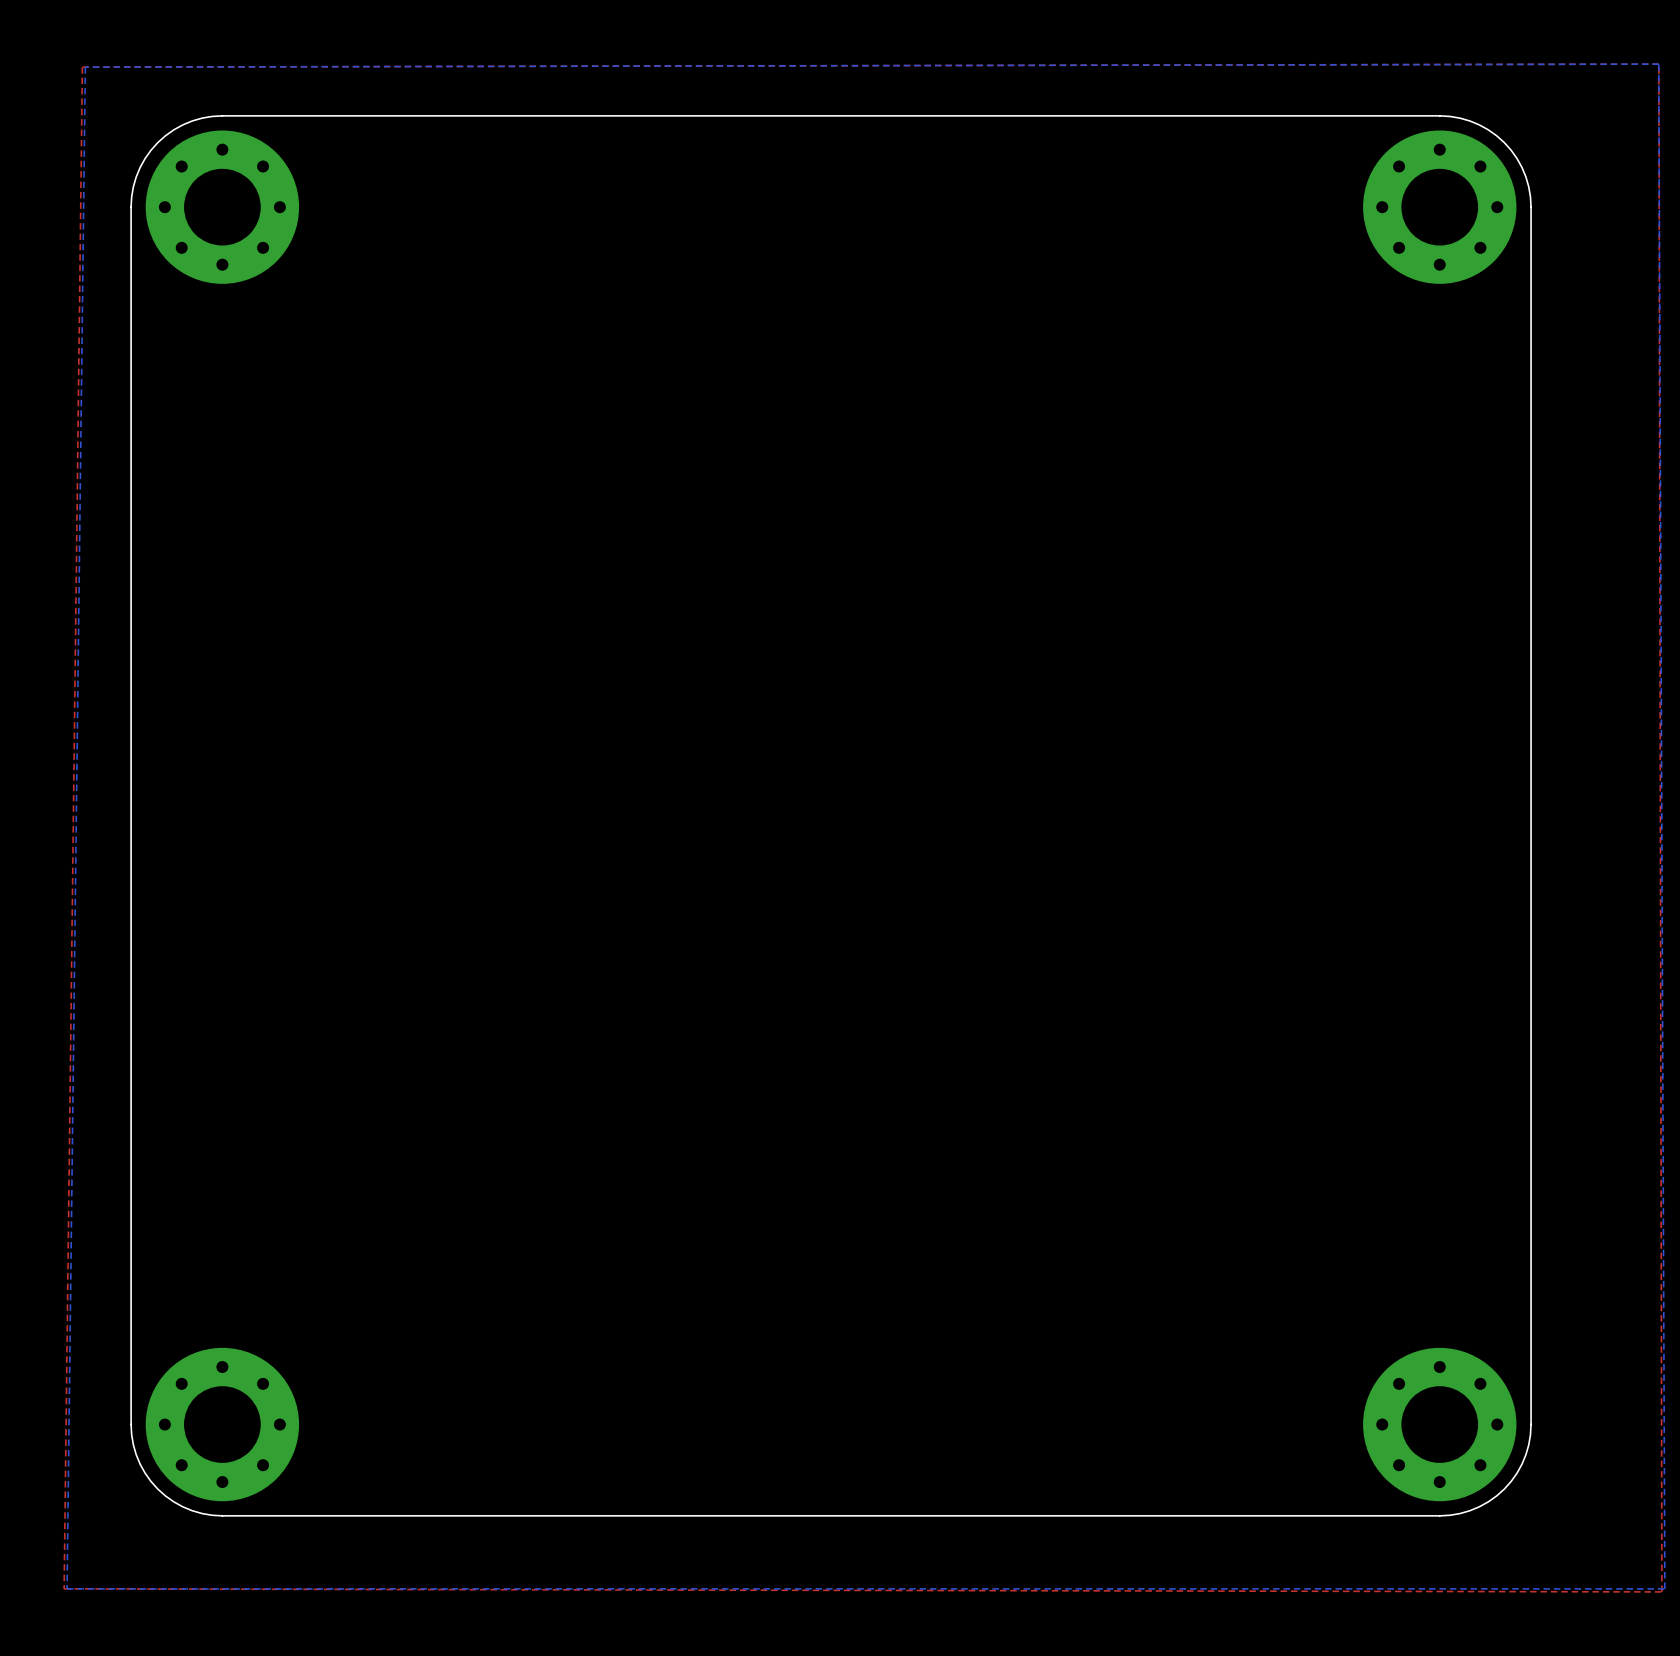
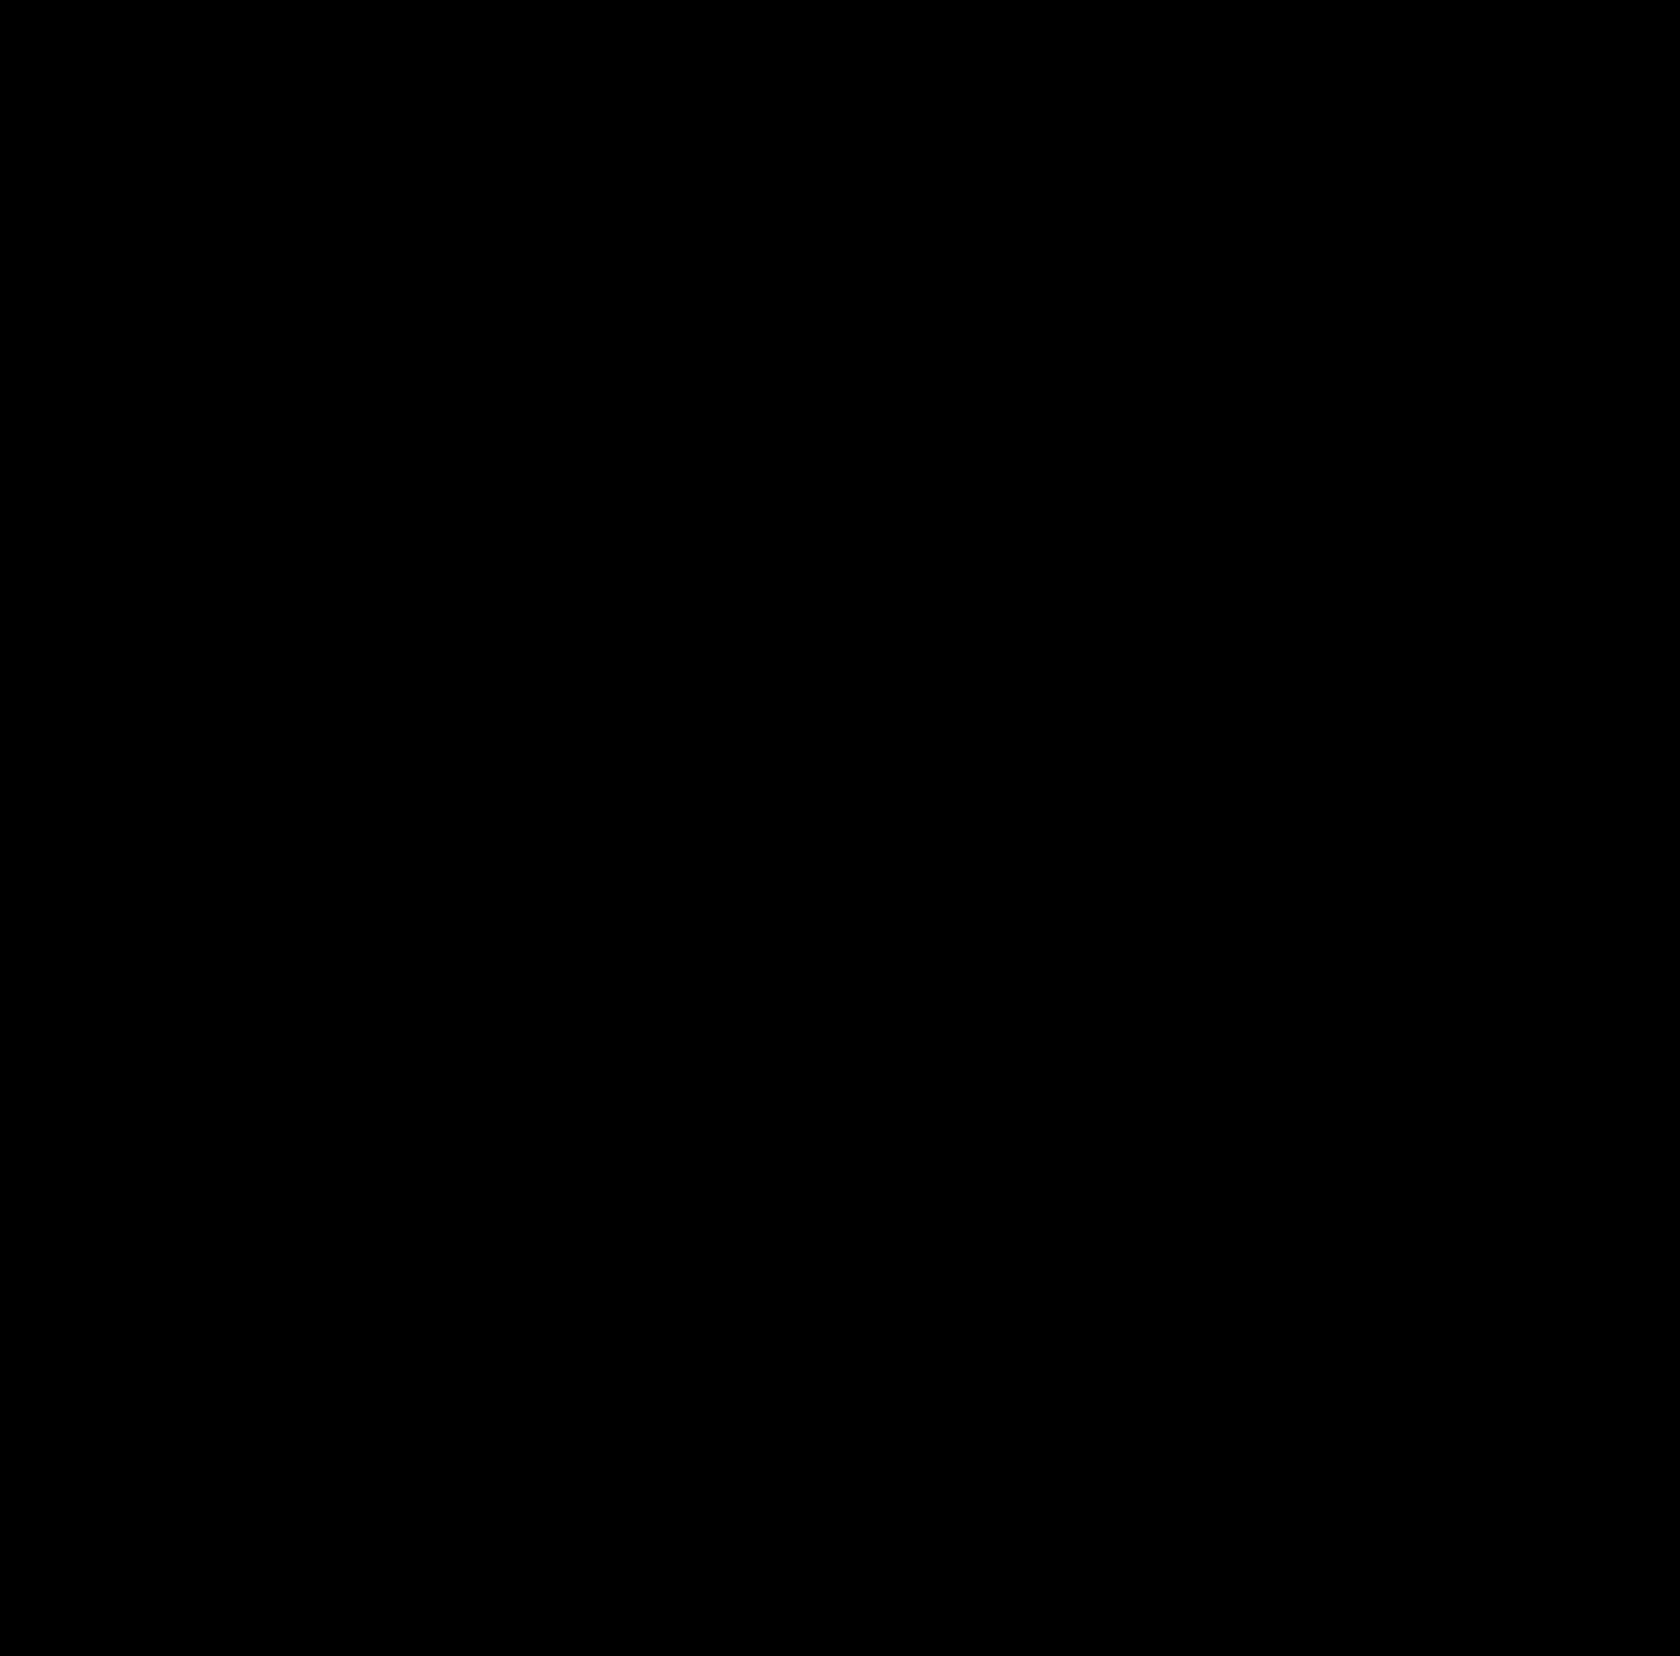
top zone outline: (1658, 64) (82, 67) (64, 1588) (1661, 1591) (1658, 64) -> none
bottom zone outline: (1658, 64) (85, 67) (67, 1588) (1664, 1588) (1658, 64) -> none
board edge: (1439, 115) (222, 115) (192, 120) (173, 129) (157, 142) (140, 167) (133, 186) (131, 207) (131, 1424) (133, 1444) (140, 1464) (157, 1489) (173, 1501) (192, 1510) (222, 1515) (1439, 1515) (1460, 1513) (1479, 1506) (1504, 1489) (1522, 1464) (1528, 1444) (1531, 1424) (1531, 207) (1528, 186) (1522, 167) (1504, 142) (1488, 129) (1469, 120) (1439, 115) -> none
part: (222, 207) -> none
part: (1439, 207) -> none
part: (222, 1424) -> none
part: (1439, 1424) -> none

